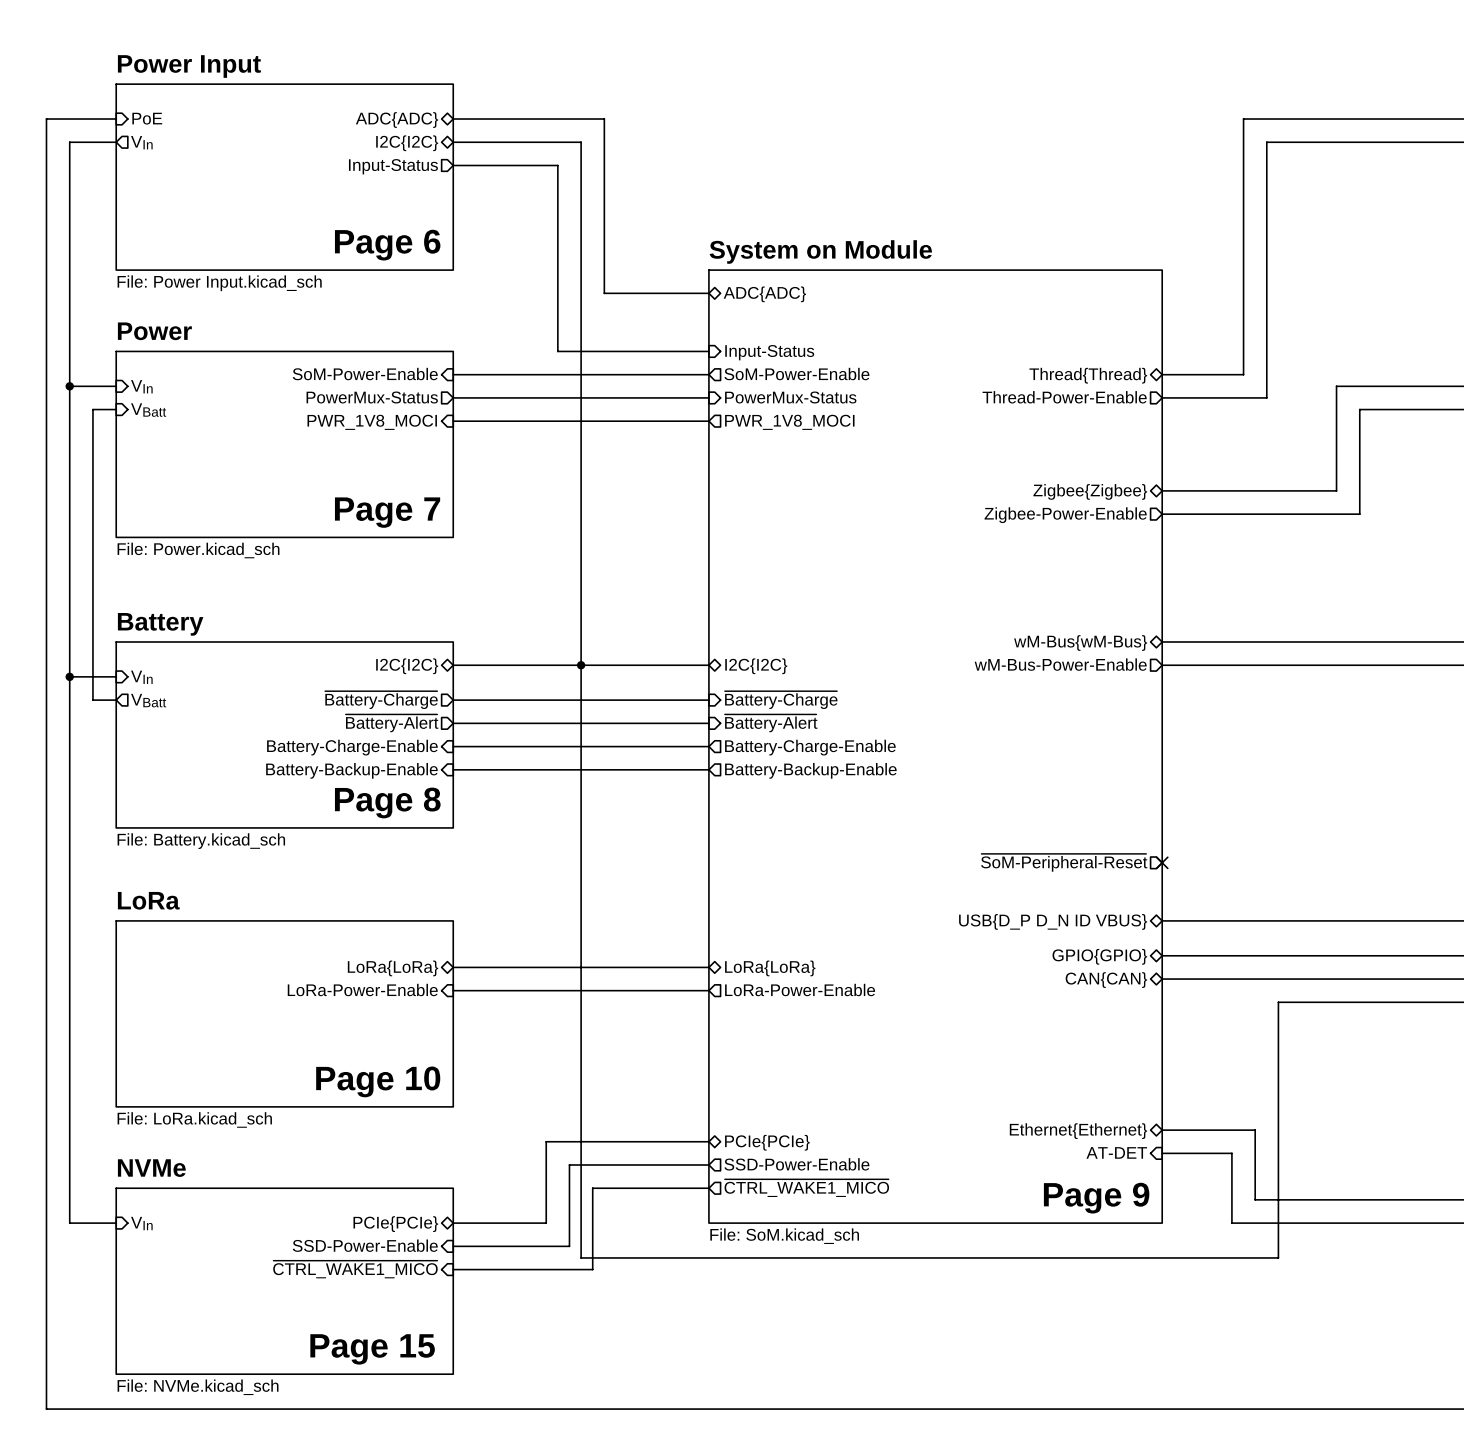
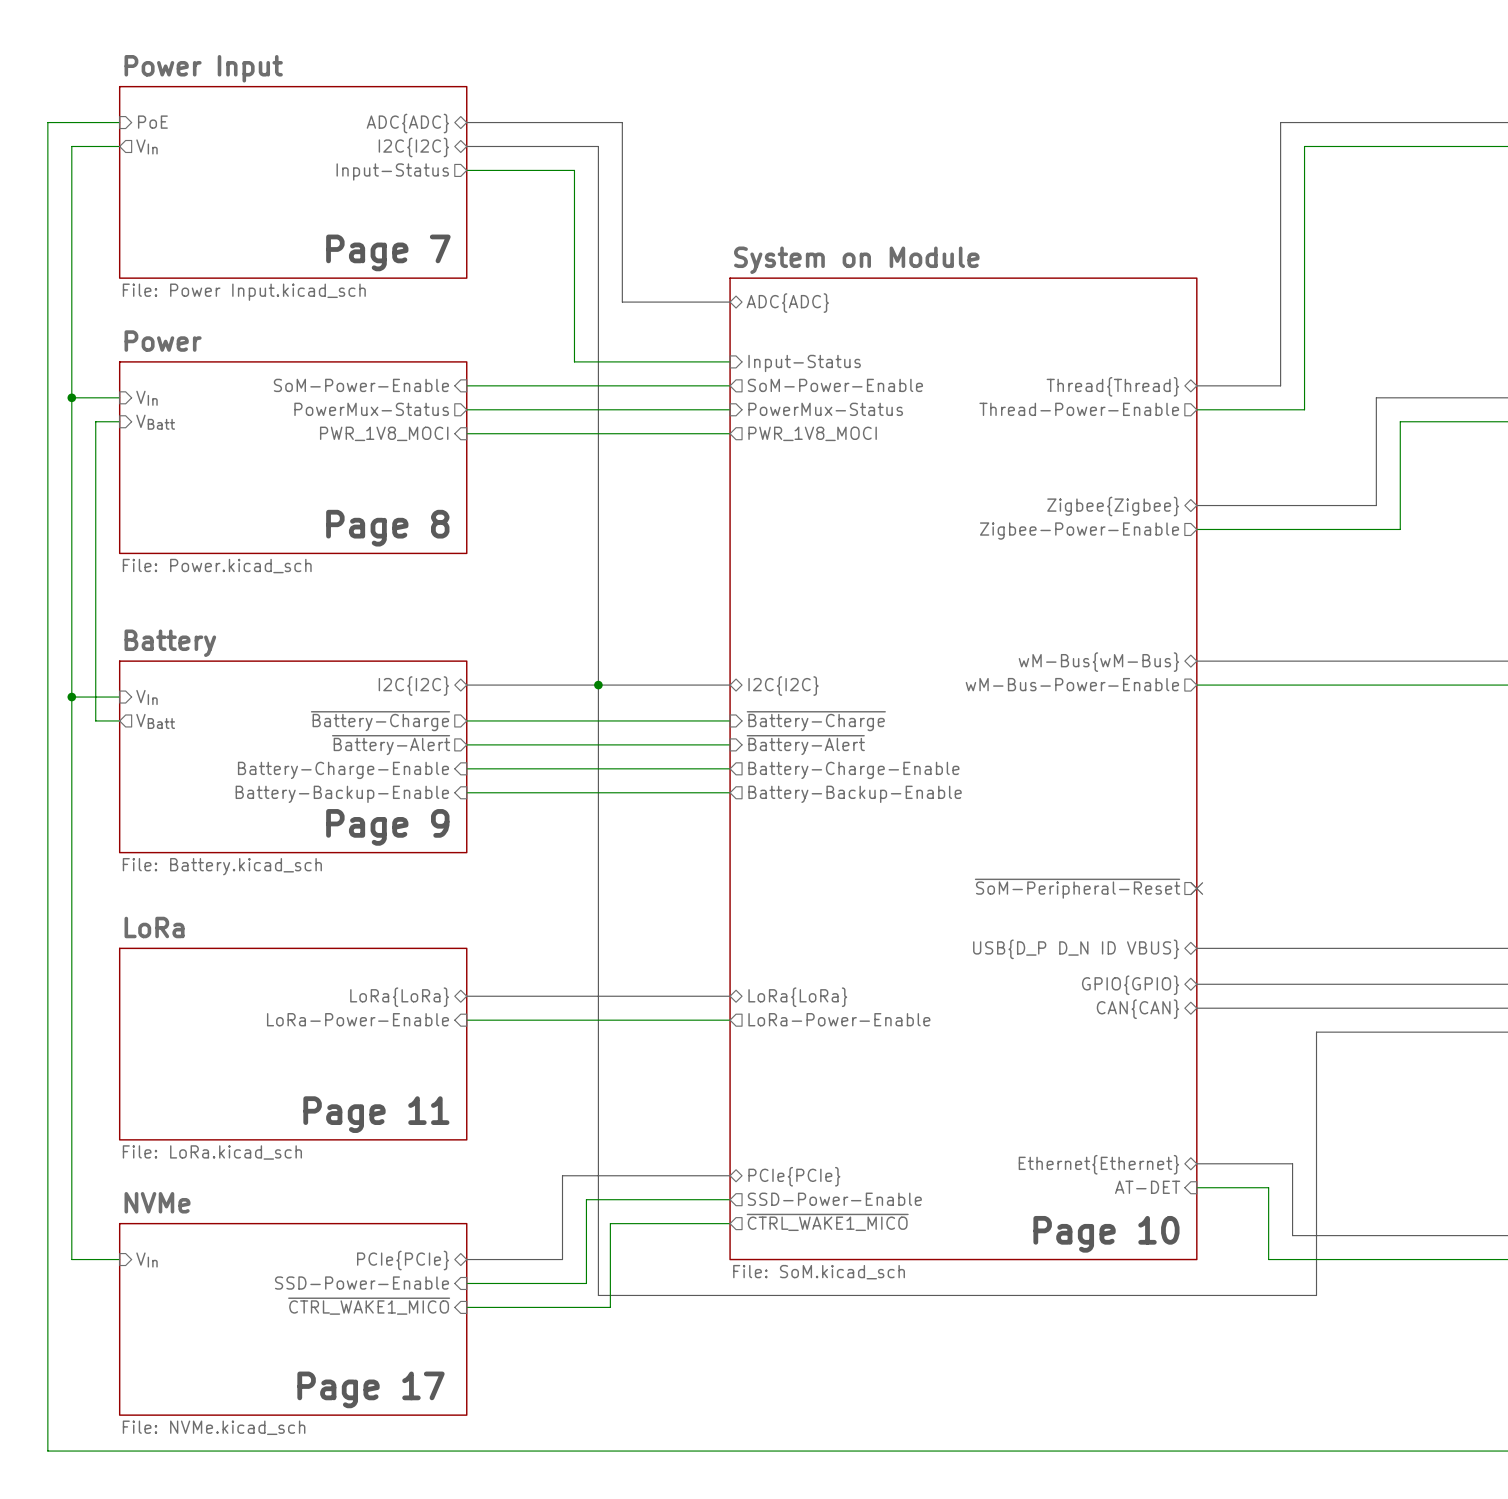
text: Page 6 (387, 245) -> Page 7 (388, 252)
text: Page 7 (387, 512) -> Page 8 (387, 528)
text: Page 8 (387, 802) -> Page 9 (387, 827)
text: Page 10 (378, 1081) -> Page 11 (376, 1114)
text: Page 9 (1096, 1198) -> Page 10 (1106, 1234)
text: Page 15 (372, 1349) -> Page 17 (370, 1389)

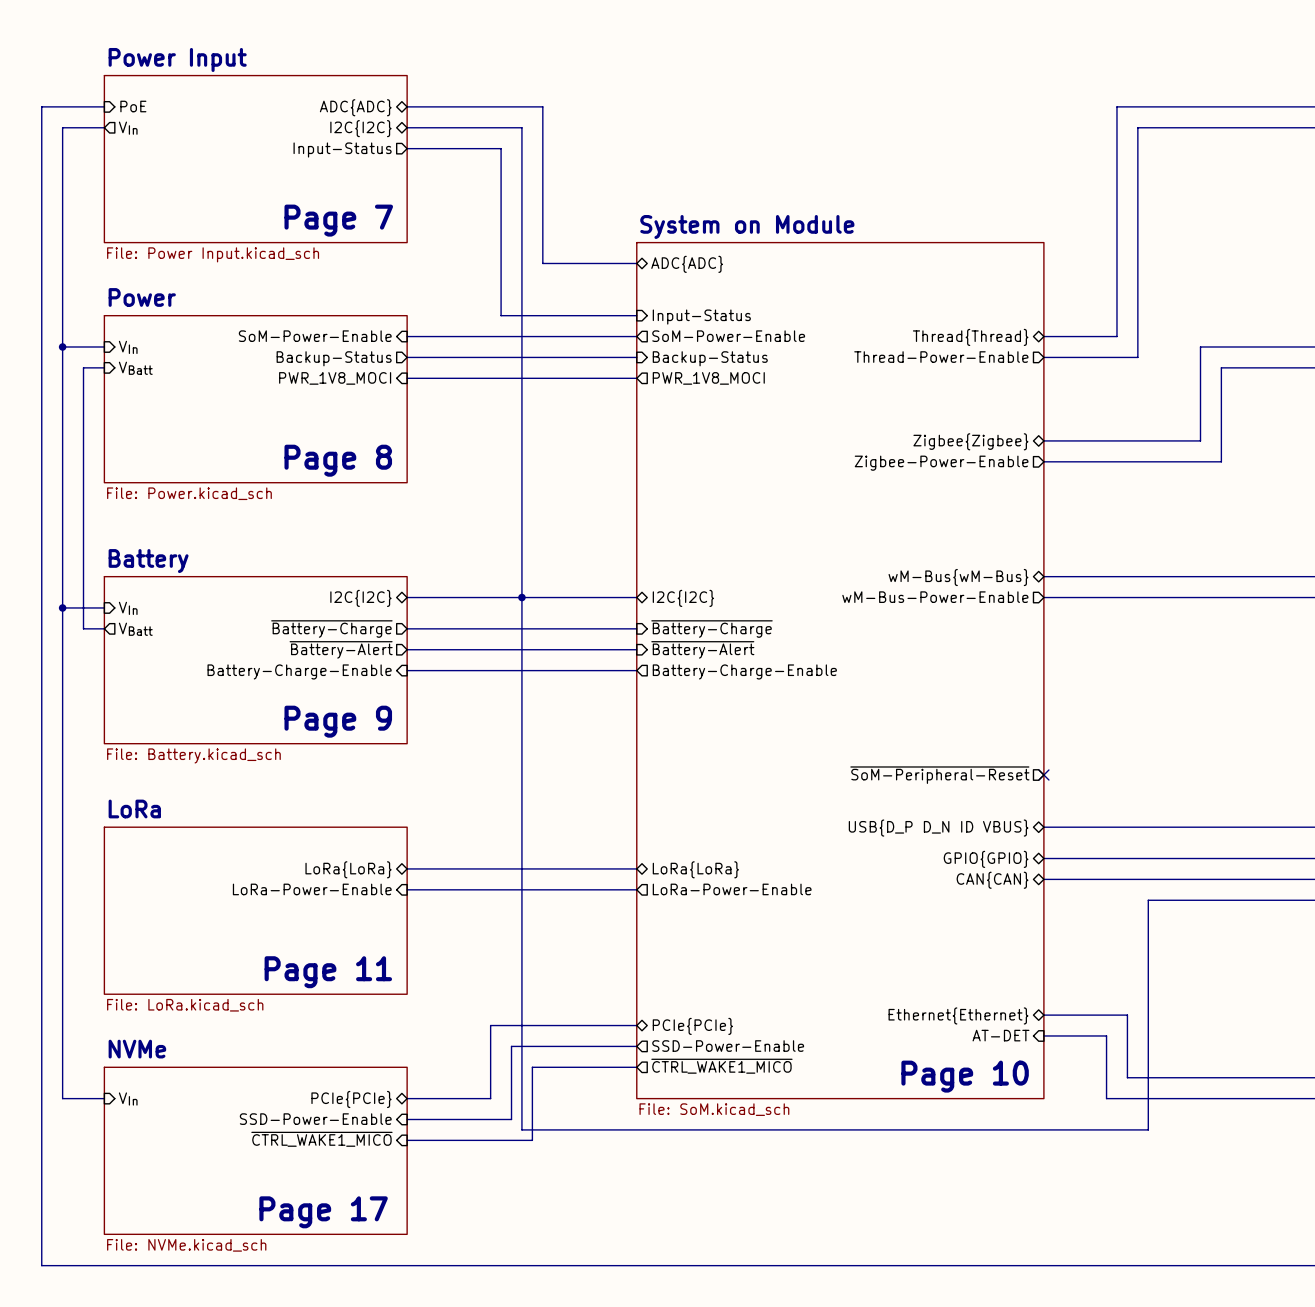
sheet pin: PowerMux-Status (371, 409) -> Backup-Status (334, 358)
sheet pin: PowerMux-Status (825, 409) -> Backup-Status (710, 358)
wire: (466, 792) (730, 792) -> none
sheet pin: Battery-Backup-Enable (342, 794) -> none
sheet pin: Battery-Backup-Enable (855, 794) -> none

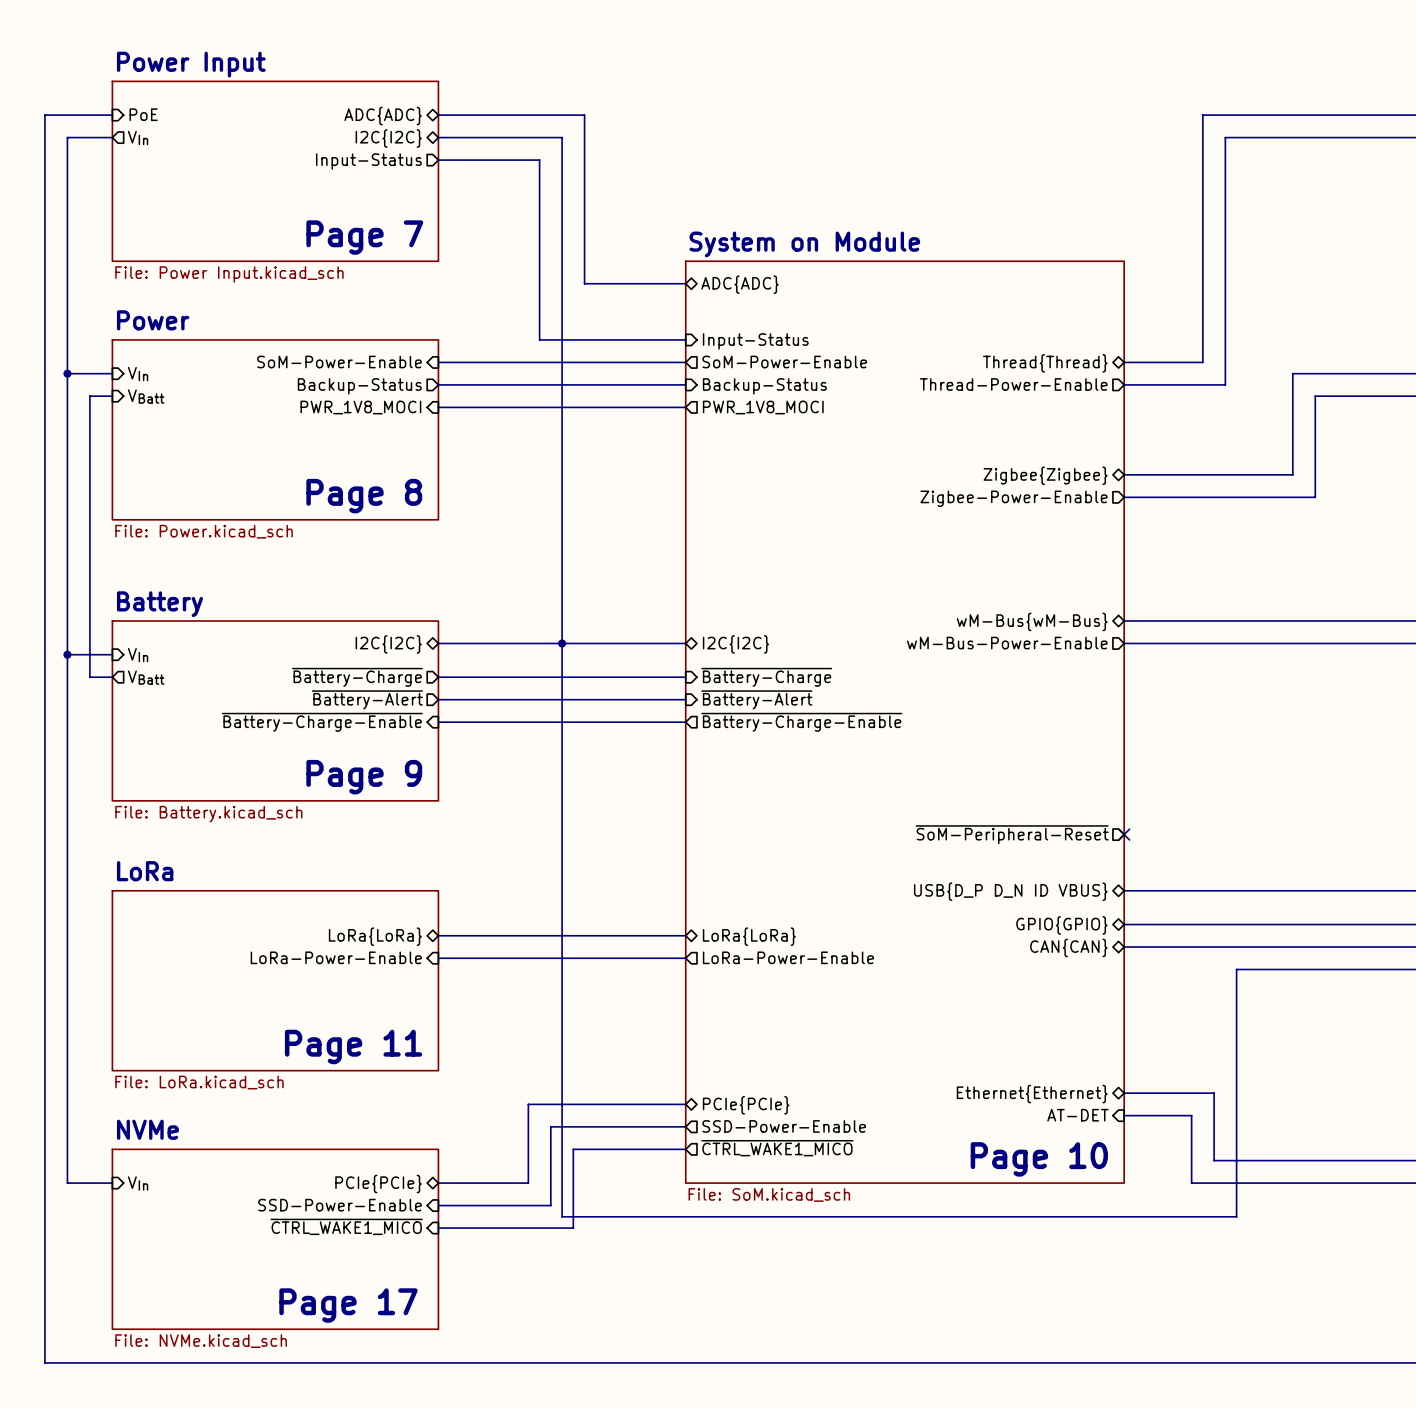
sheet pin: Battery-Charge-Enable (299, 671) -> ~{Battery-Charge-Enable} (322, 722)
sheet pin: Battery-Charge-Enable (744, 671) -> ~{Battery-Charge-Enable} (801, 722)

